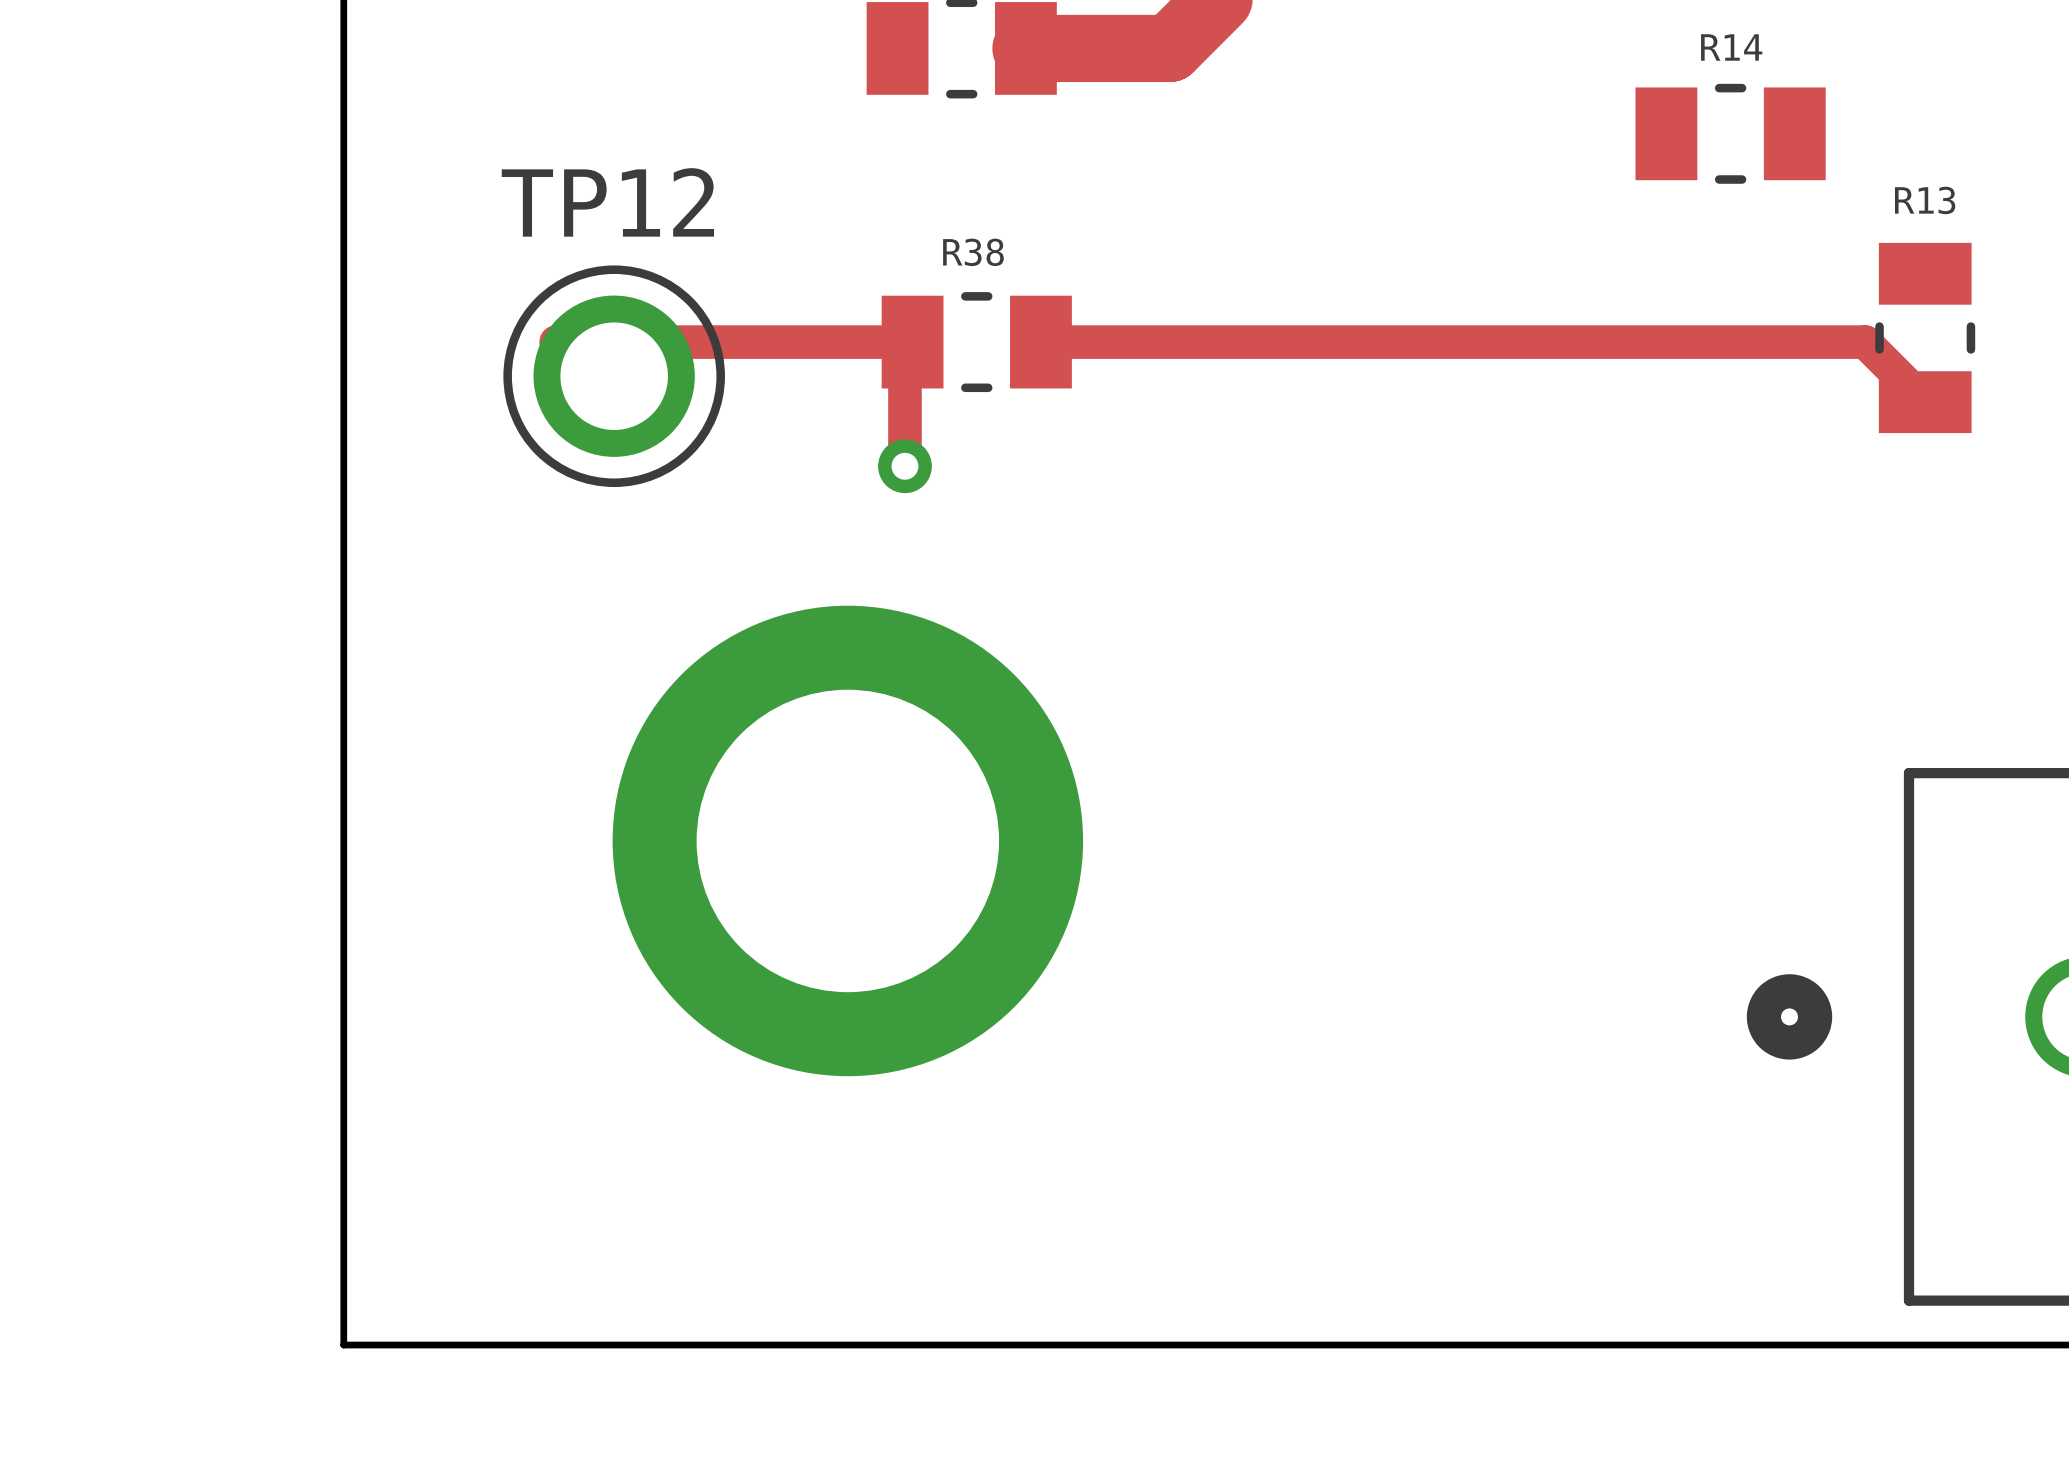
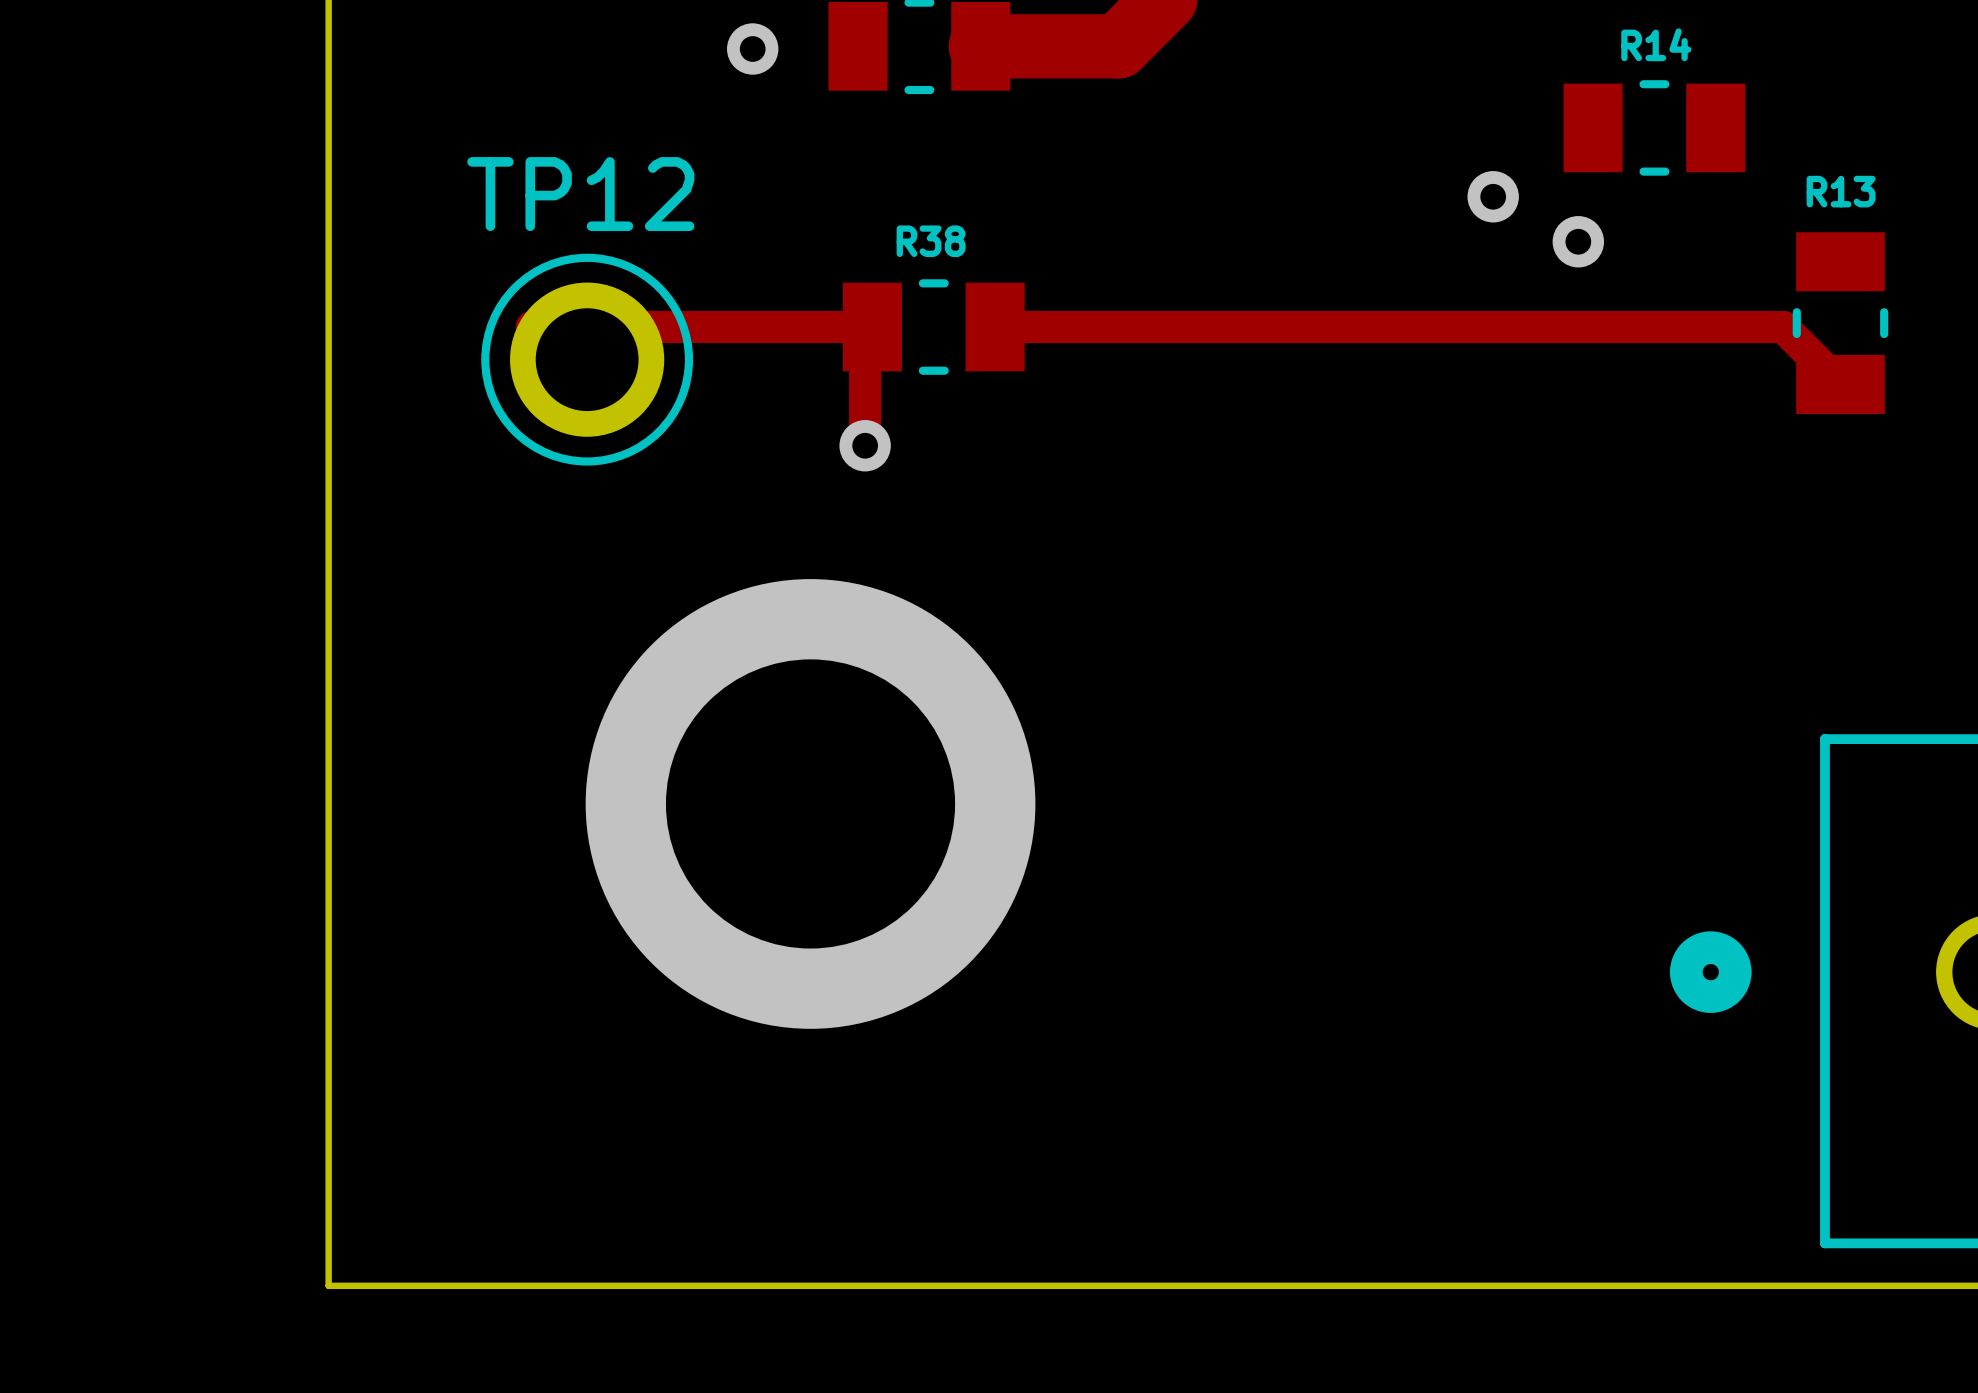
via: none -> (752, 49)
via: none -> (1493, 196)
via: none -> (1578, 241)

